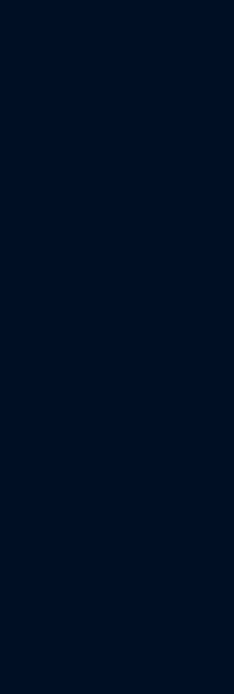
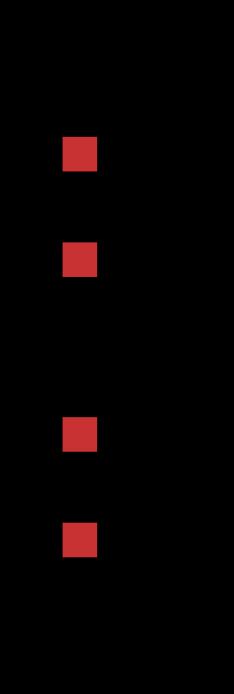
part: none -> (79, 154)
part: none -> (79, 259)
part: none -> (79, 434)
part: none -> (79, 540)

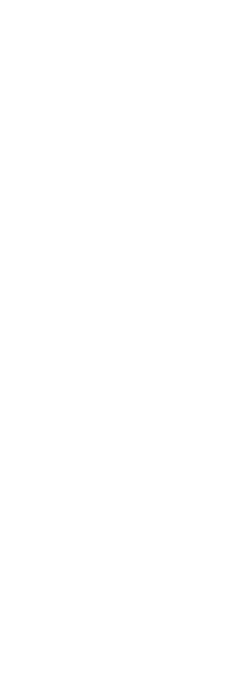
part: (79, 154) -> none
part: (79, 259) -> none
part: (79, 434) -> none
part: (79, 540) -> none

